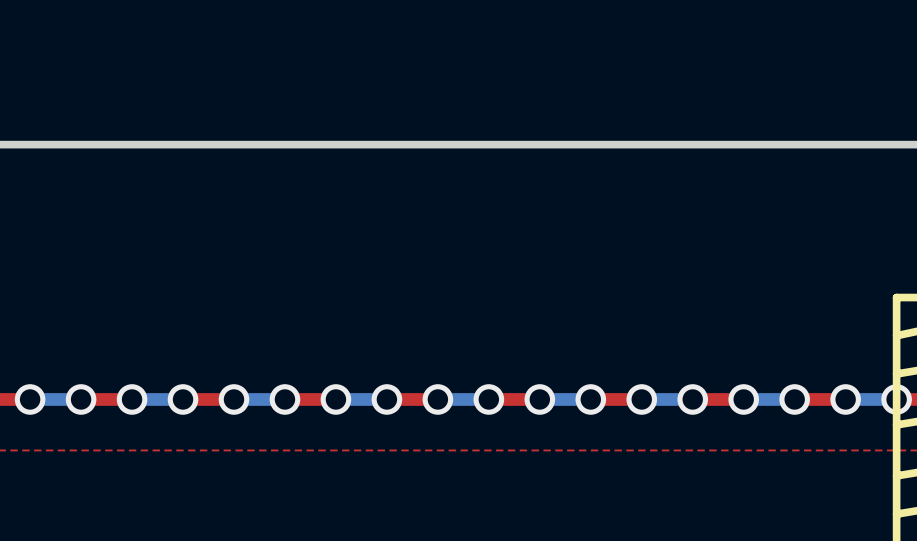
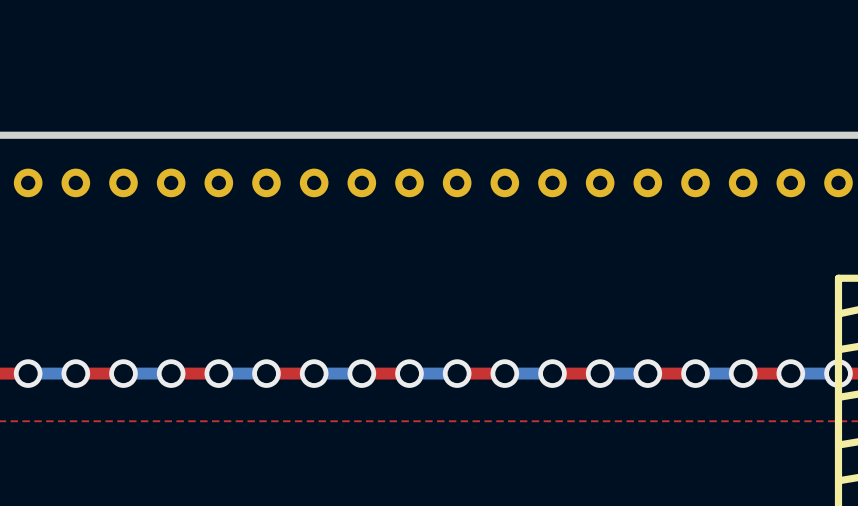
part: none -> (28, 182)
part: none -> (75, 182)
part: none -> (123, 182)
part: none -> (171, 182)
part: none -> (218, 182)
part: none -> (266, 182)
part: none -> (314, 182)
part: none -> (361, 182)
part: none -> (409, 182)
part: none -> (457, 182)
part: none -> (504, 182)
part: none -> (552, 182)
part: none -> (600, 182)
part: none -> (647, 182)
part: none -> (695, 182)
part: none -> (743, 182)
part: none -> (790, 182)
part: none -> (838, 182)

